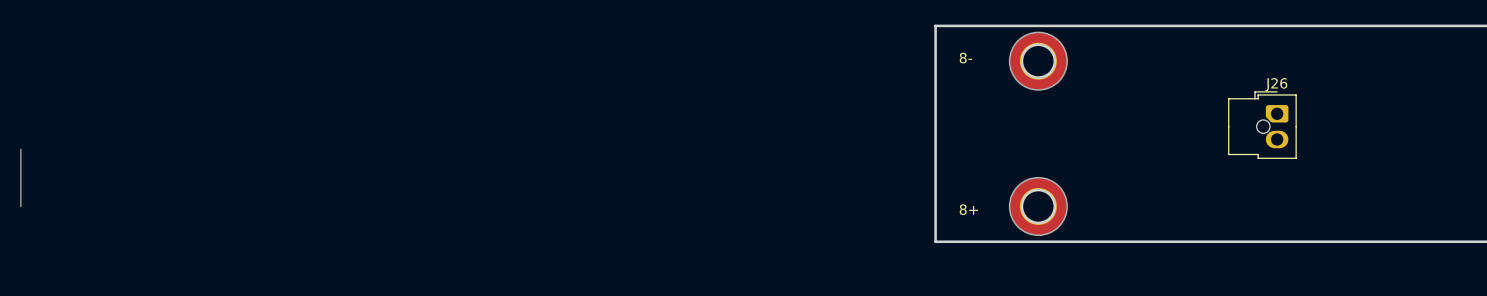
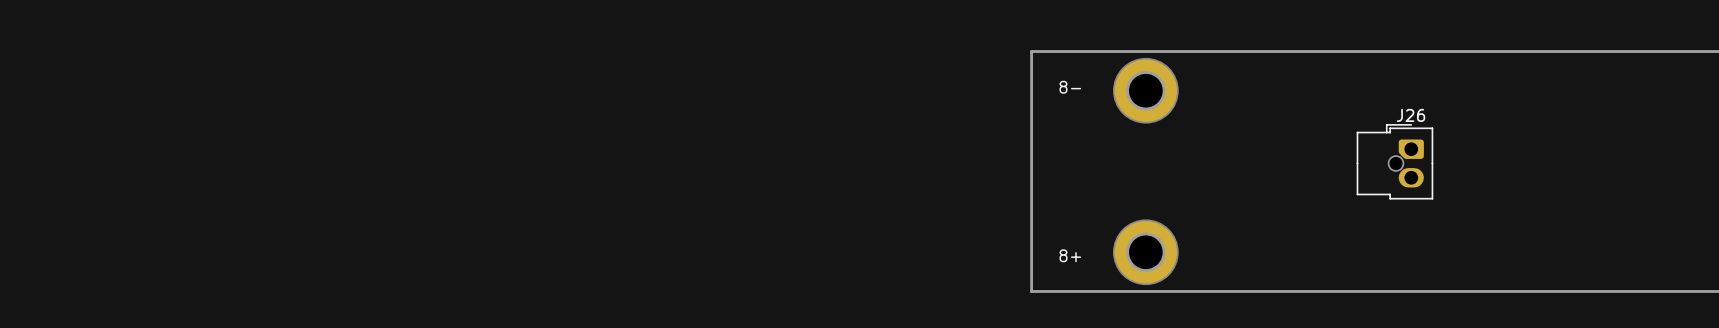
line: (20, 149) (20, 206) -> none

